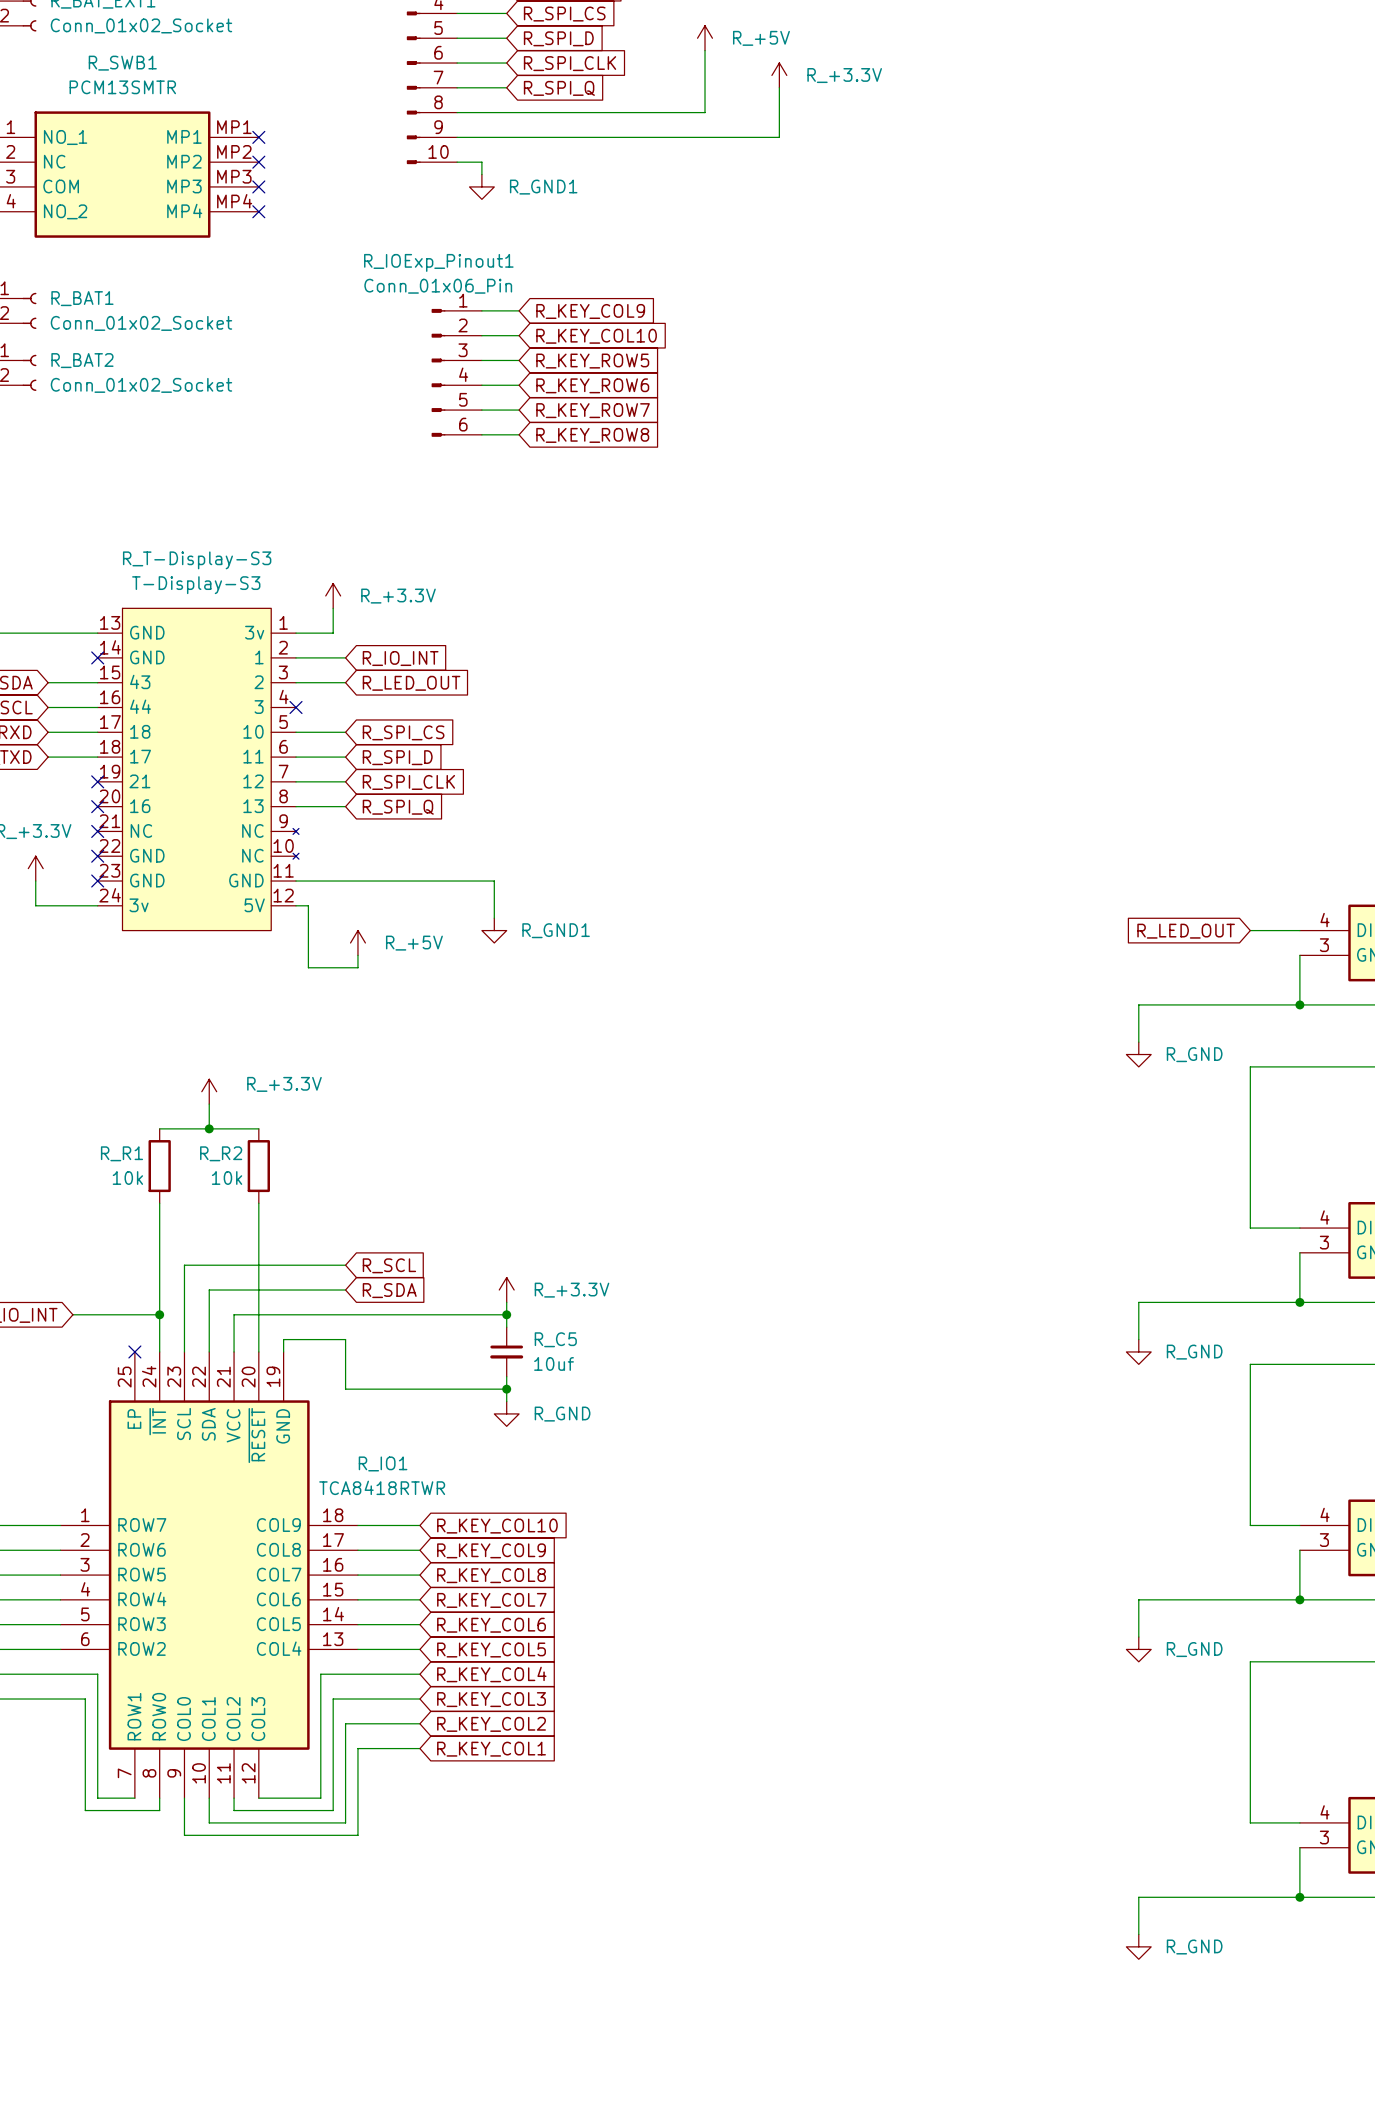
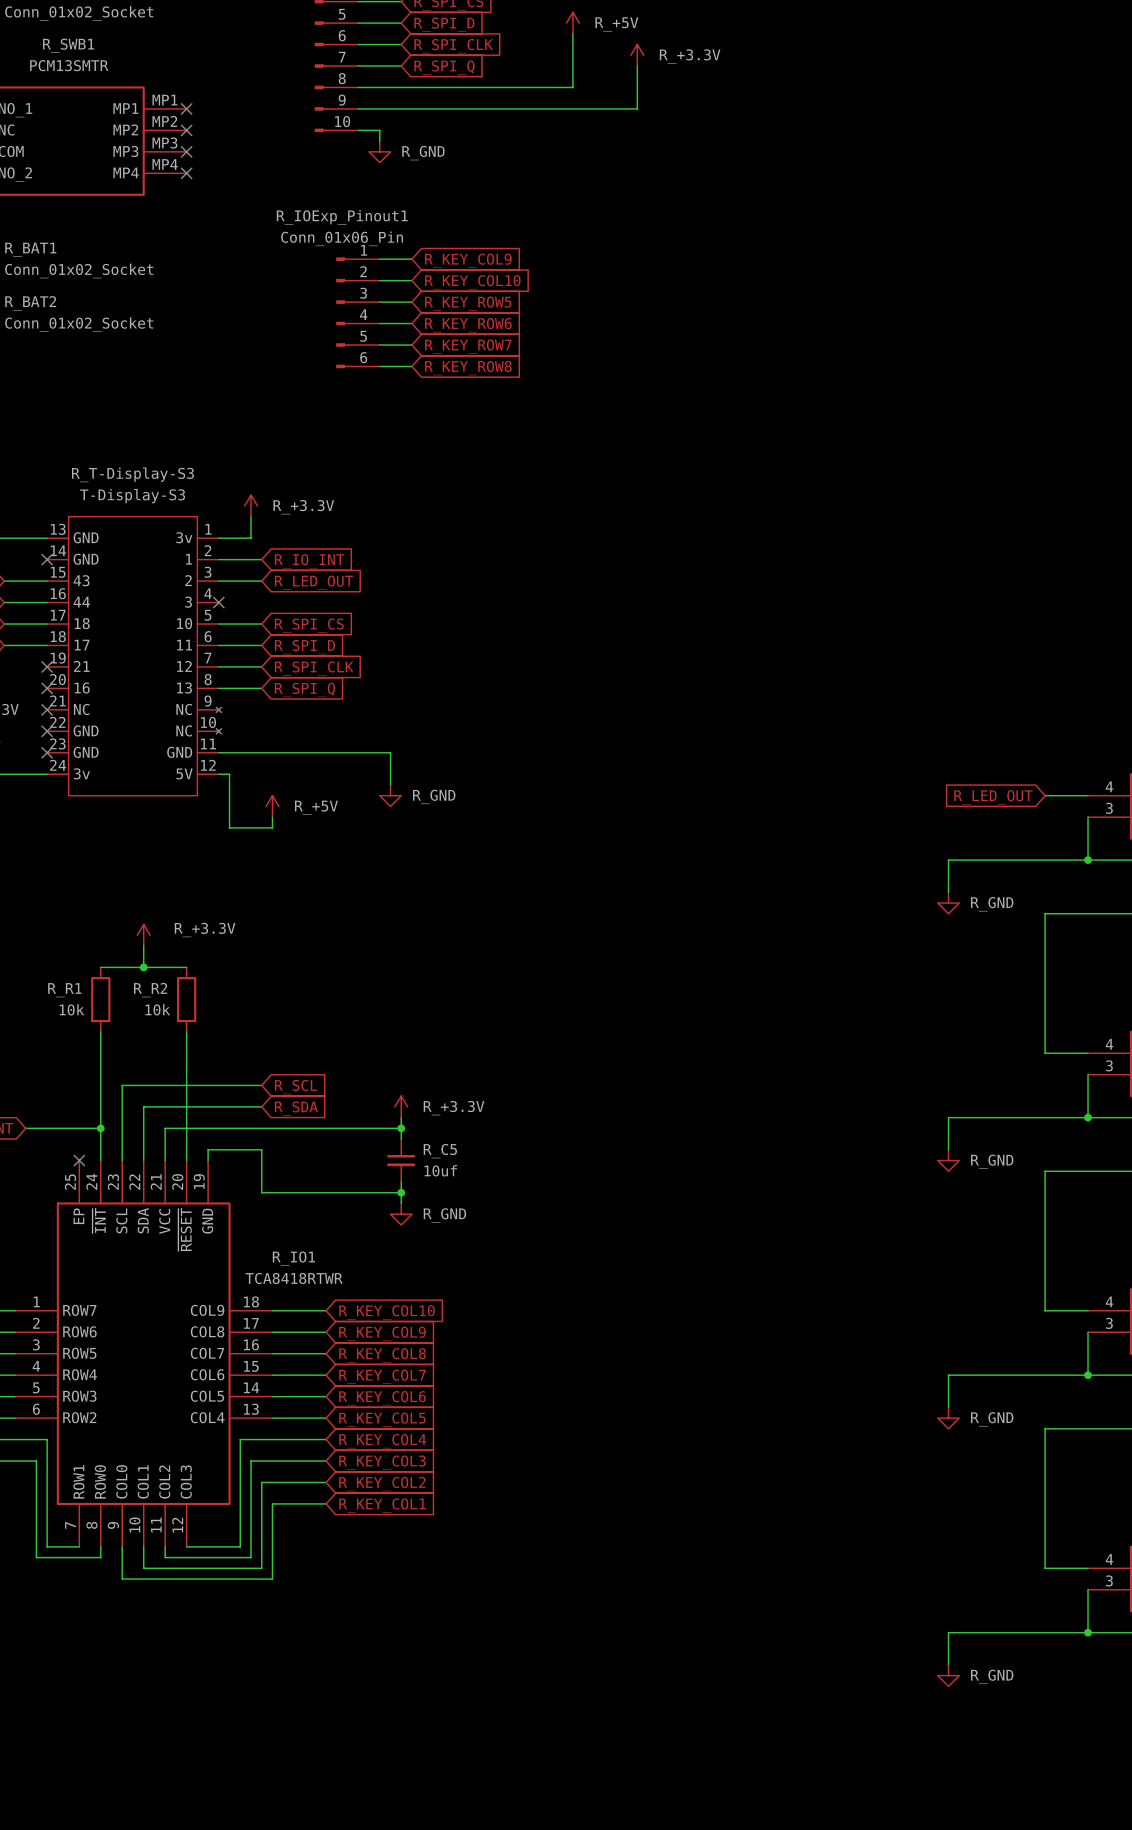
power symbol: R_GND1 (481, 186) -> R_GND (379, 151)
power symbol: R_GND1 (494, 930) -> R_GND (390, 795)

